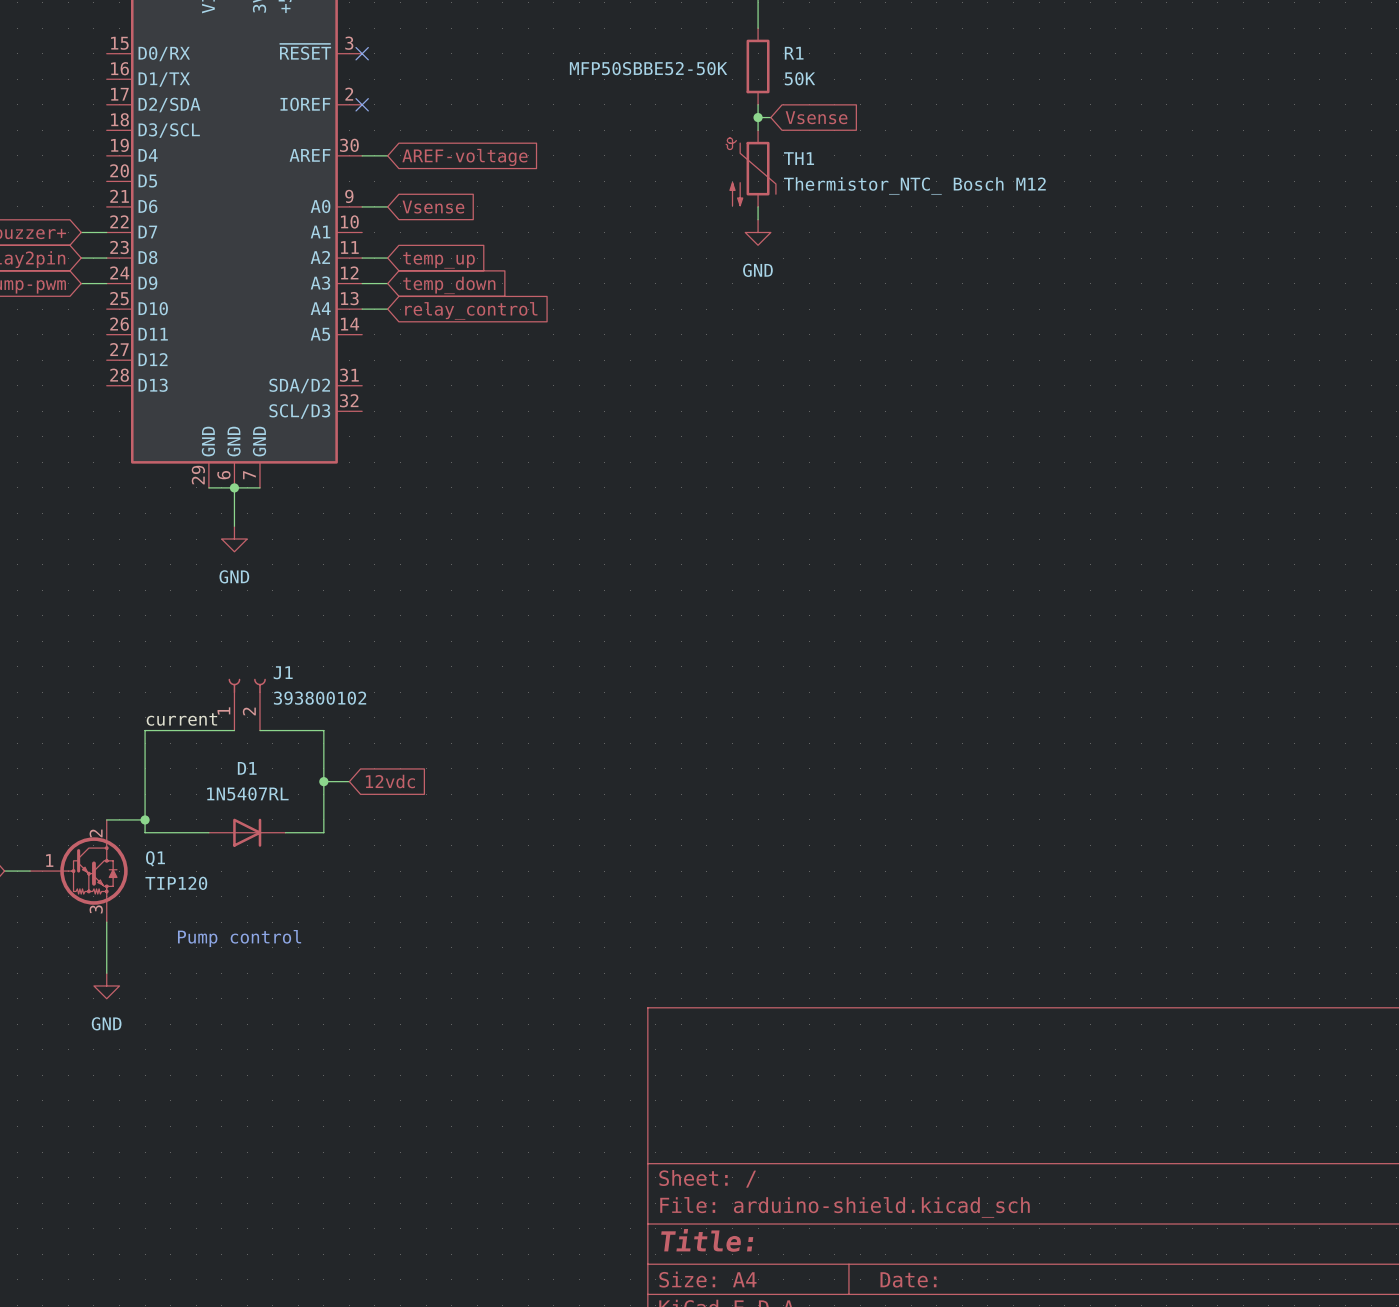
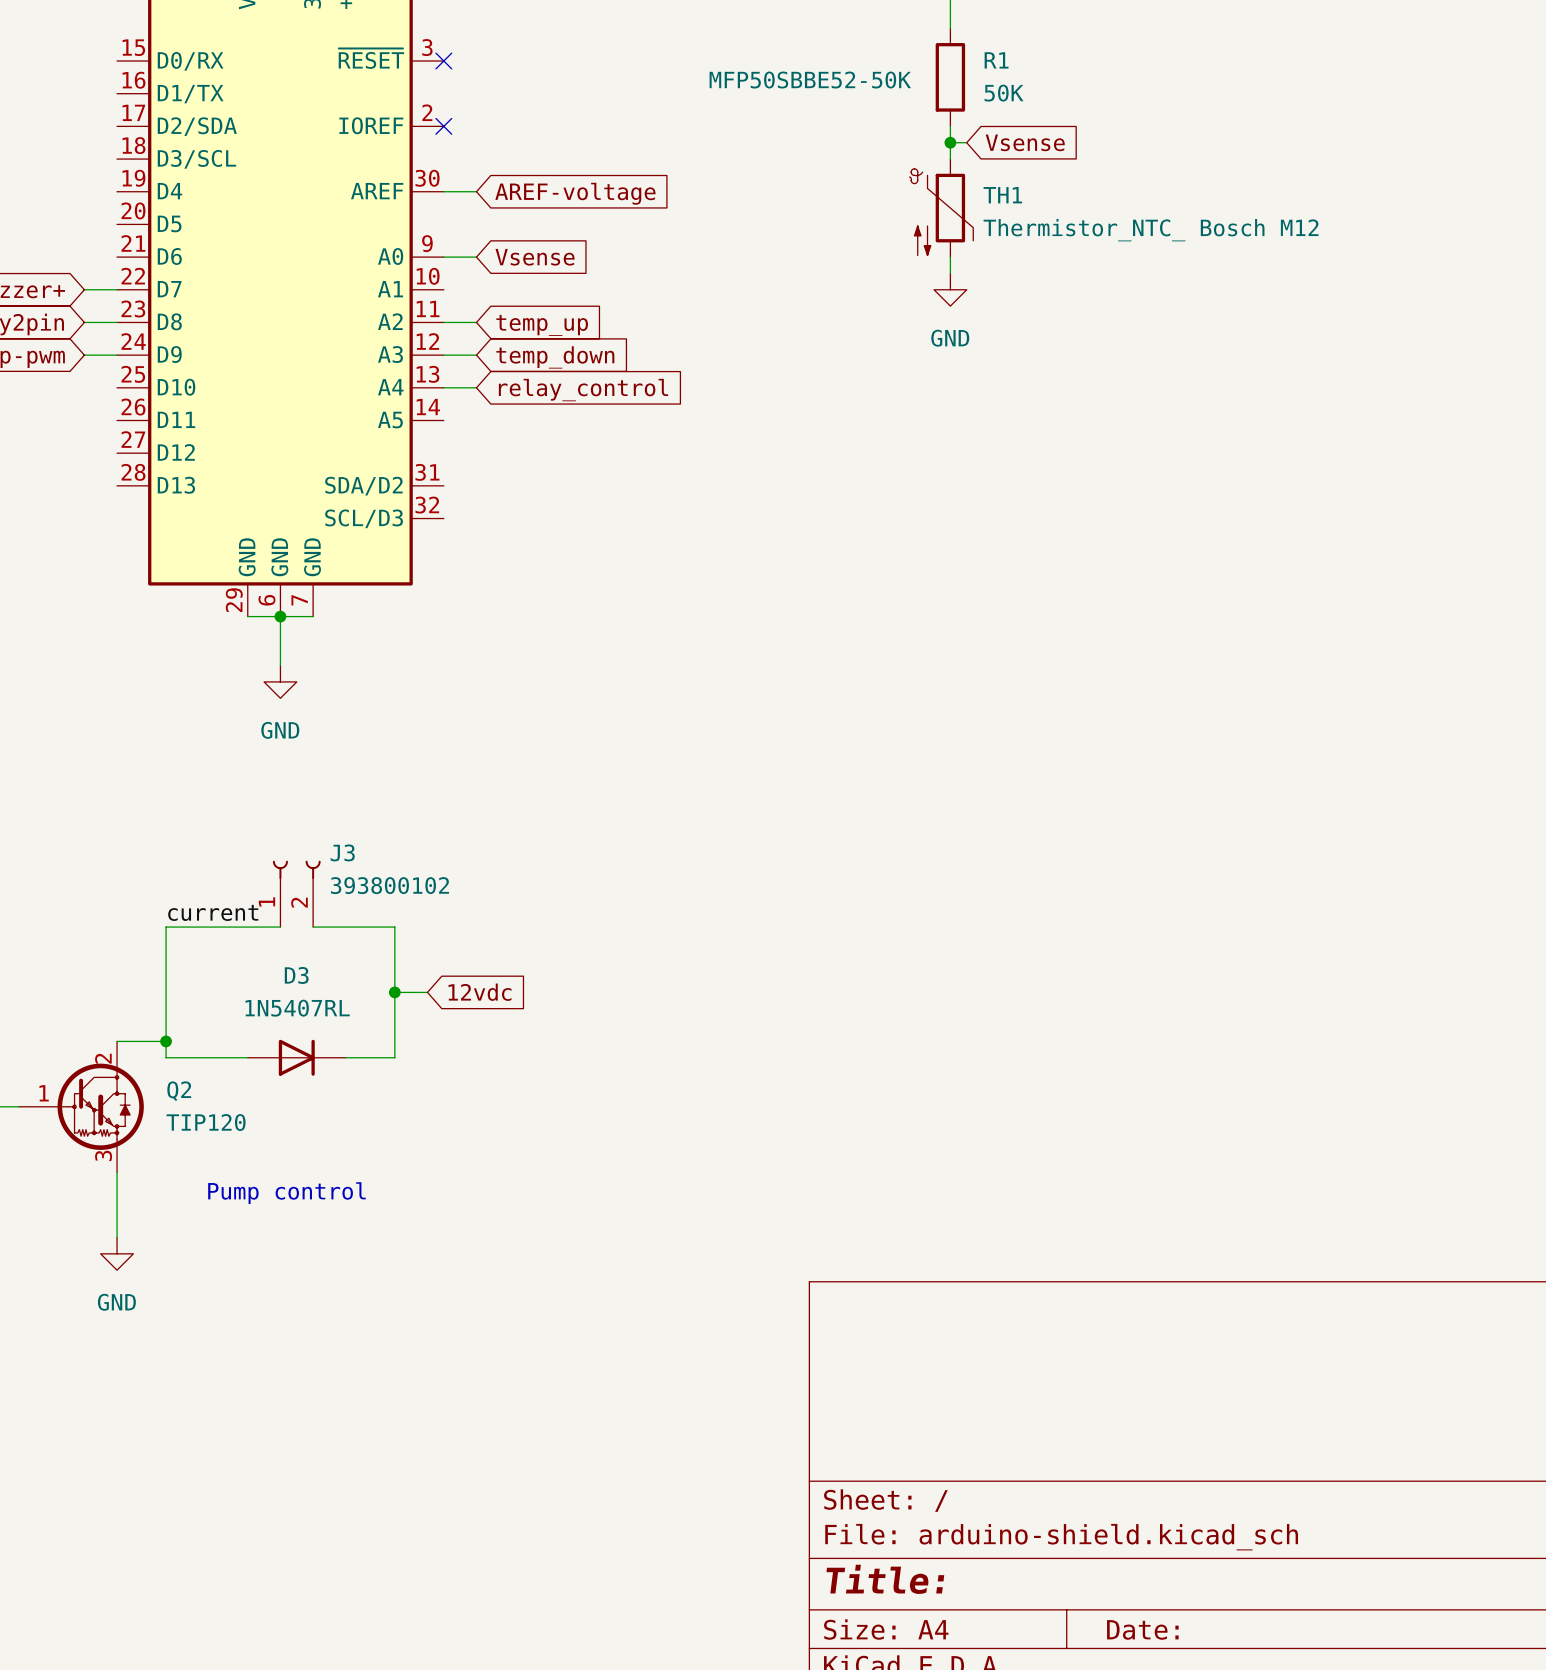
J1 name: J1 (283, 672) -> J3 (342, 852)
D1 name: D1 (247, 768) -> D3 (296, 975)
Q1 name: Q1 (155, 858) -> Q2 (179, 1091)

